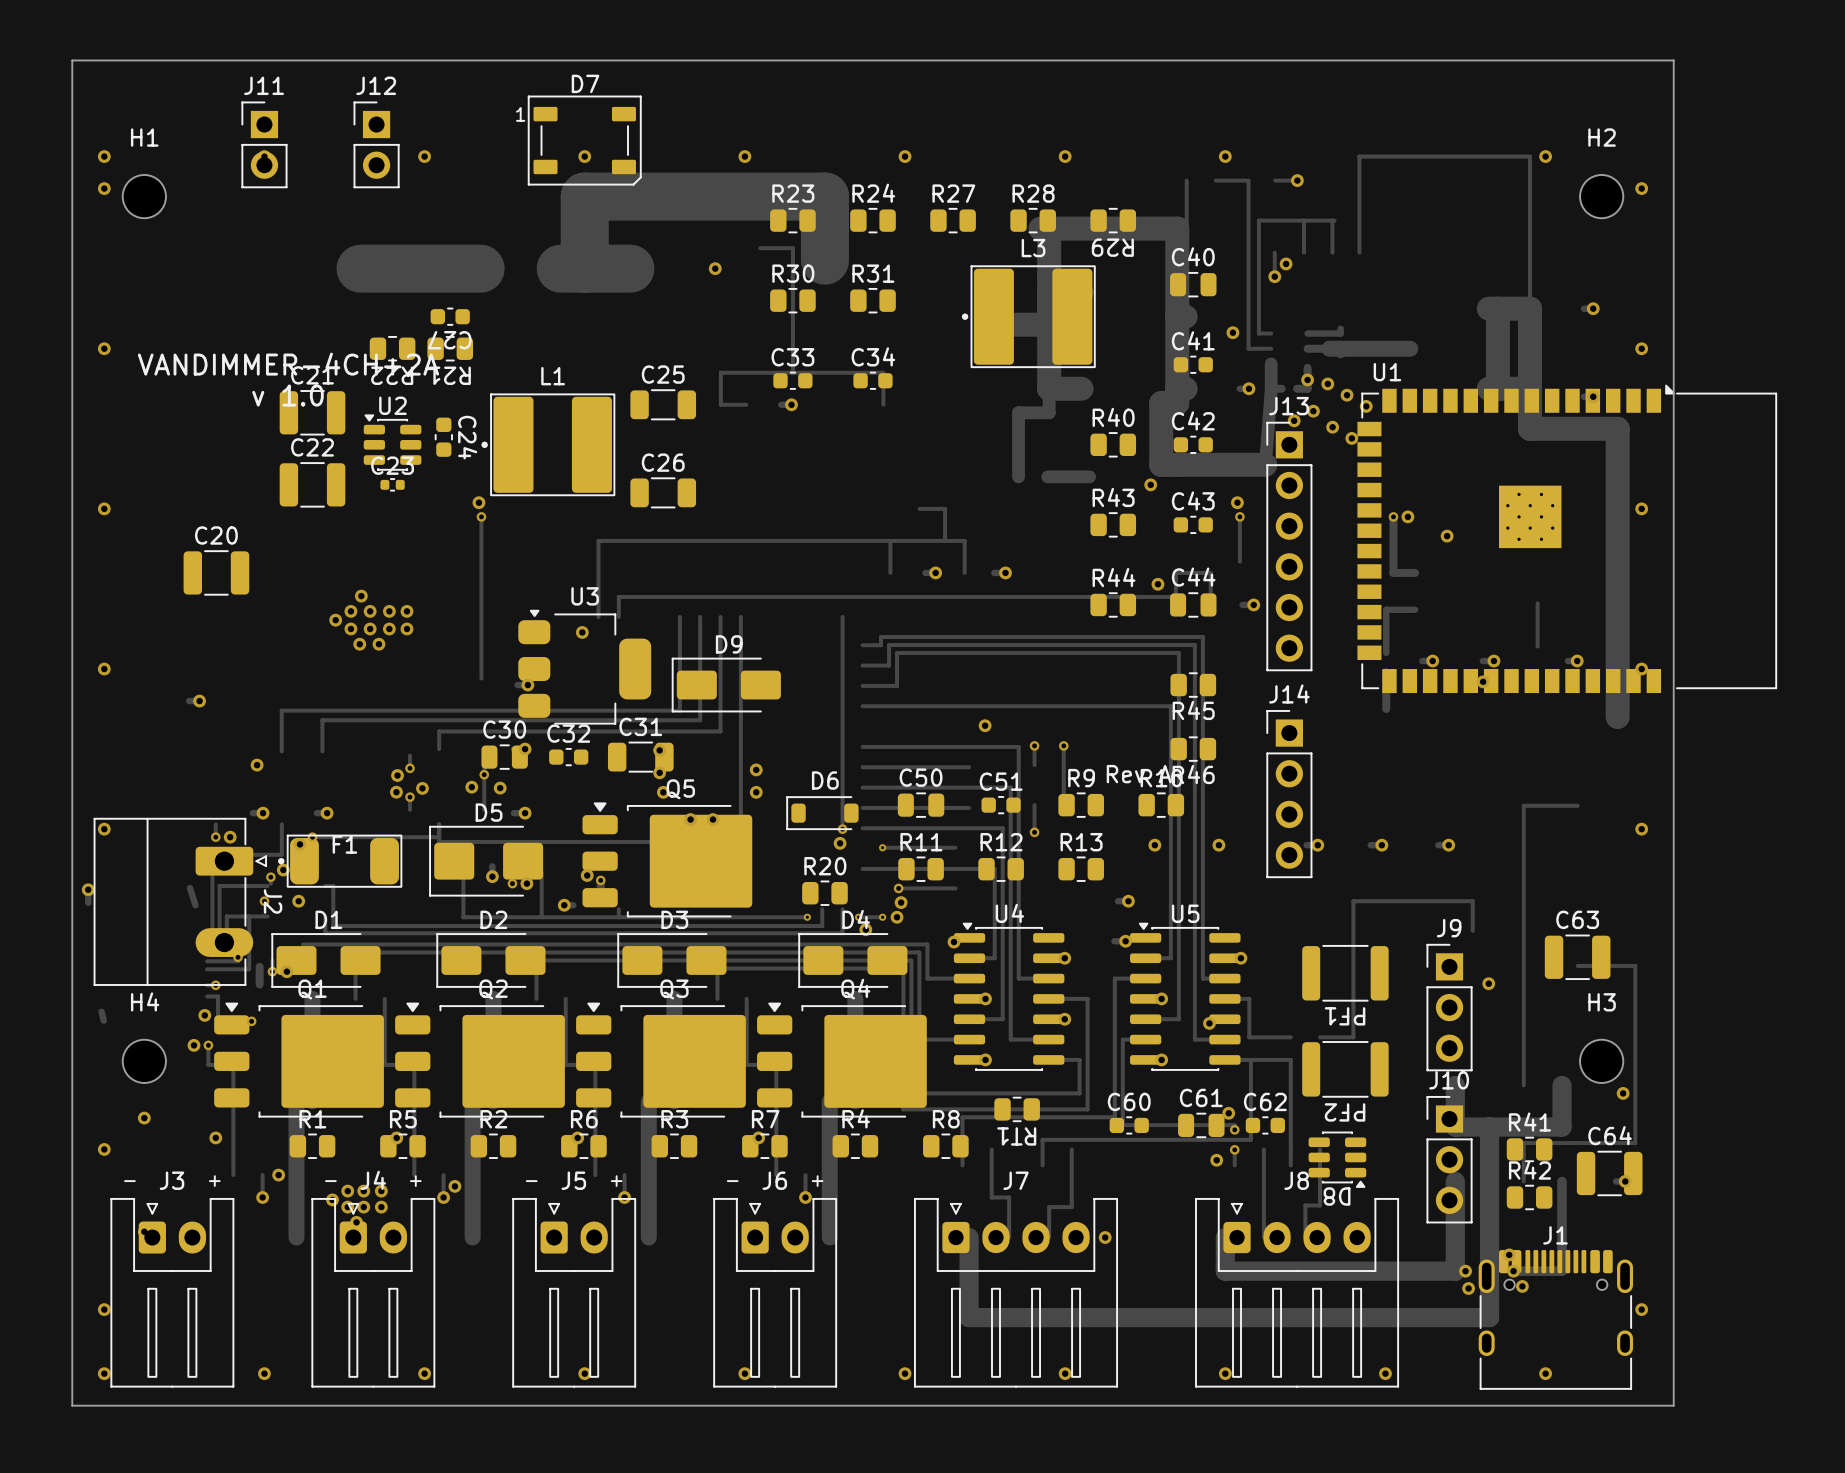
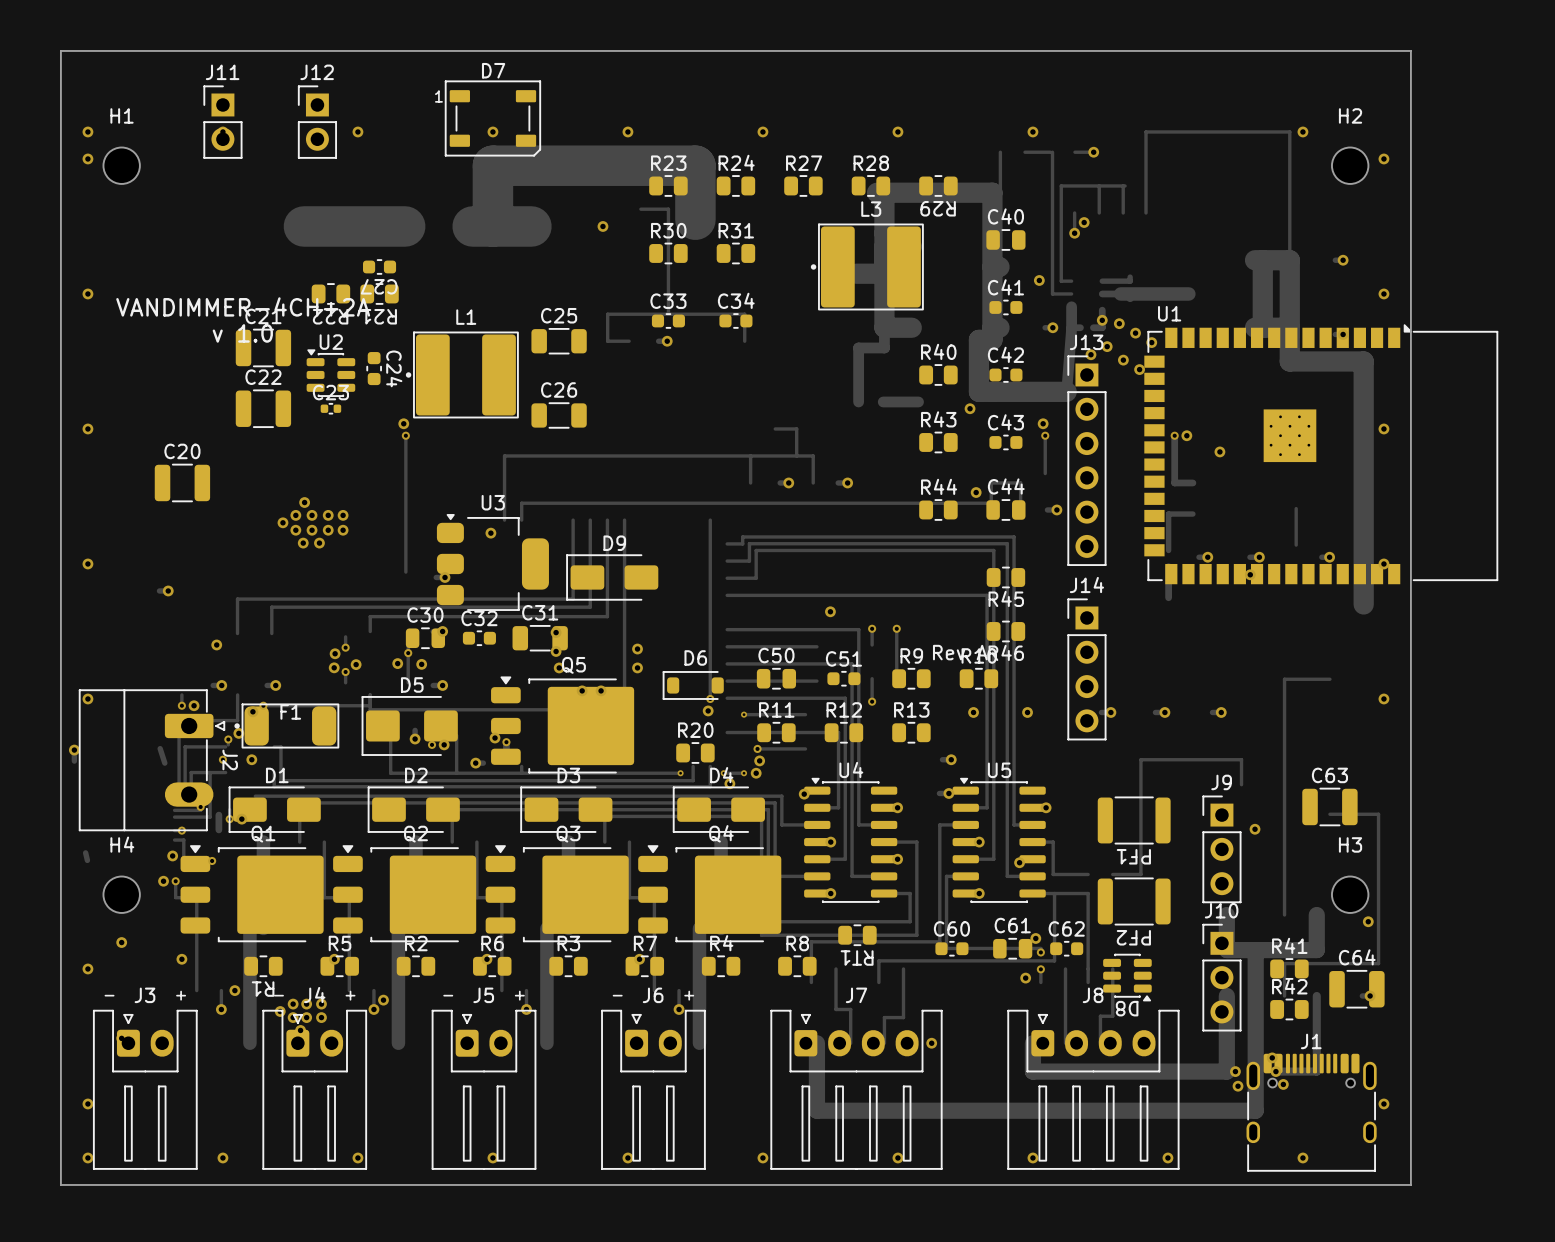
R1 name rotation: 0° (312, 1119) -> 180° (263, 989)
R1 name position: R1 (312, 1119) -> R1 (263, 989)

